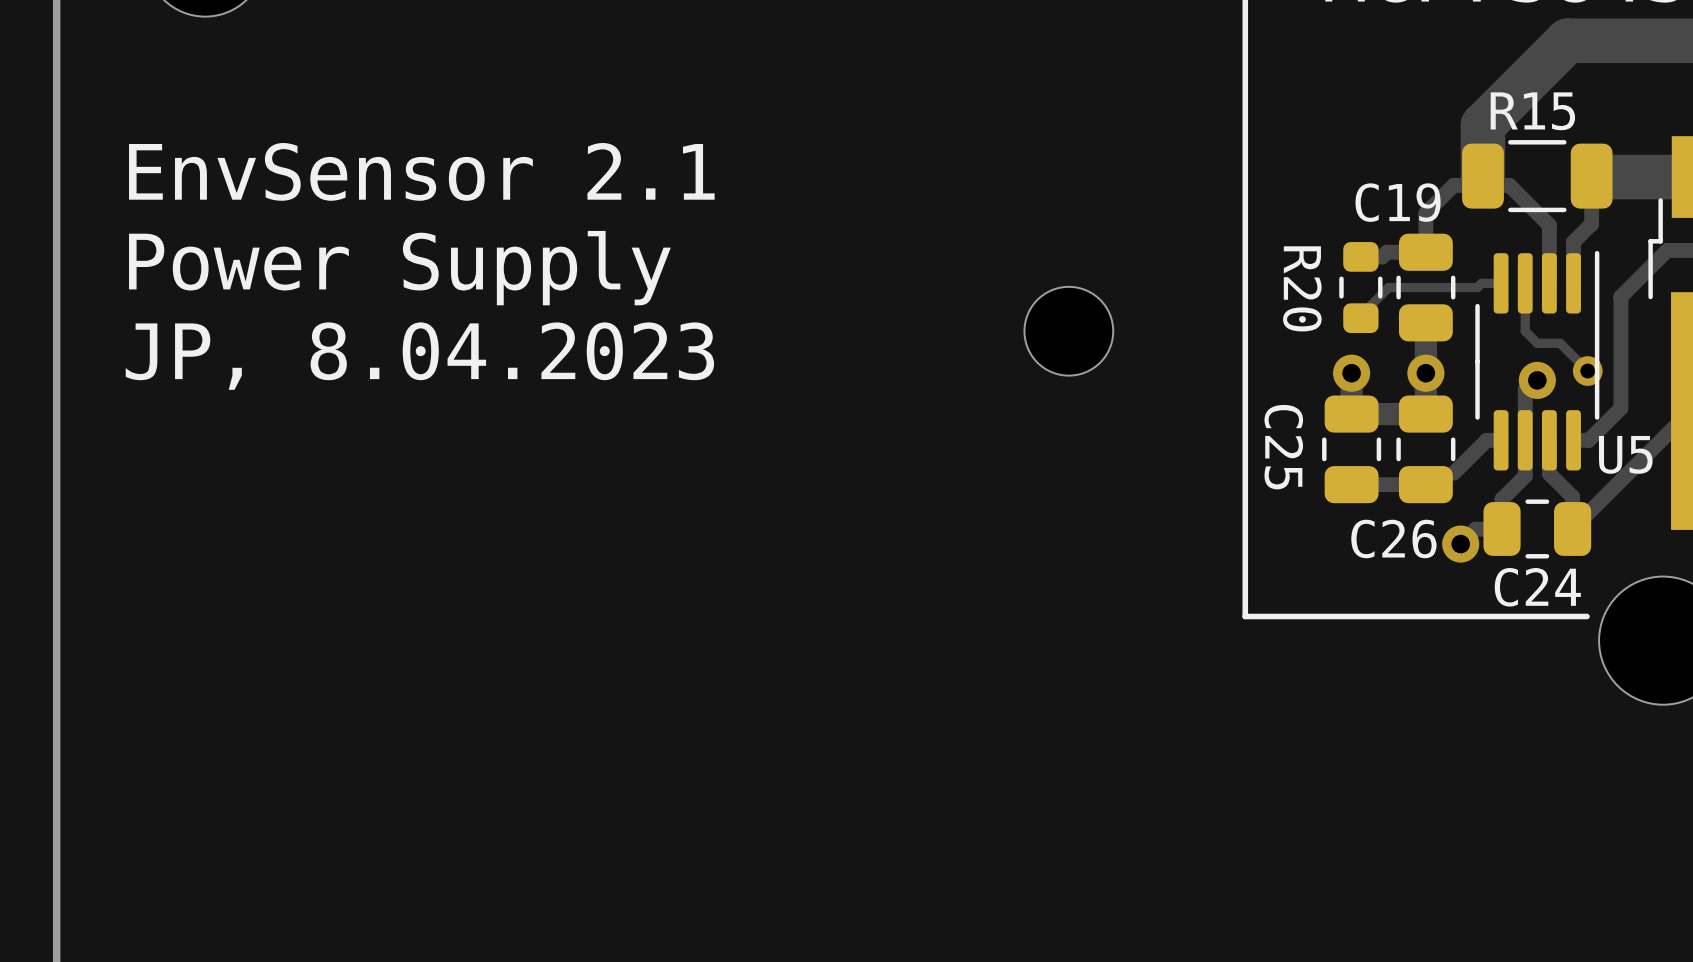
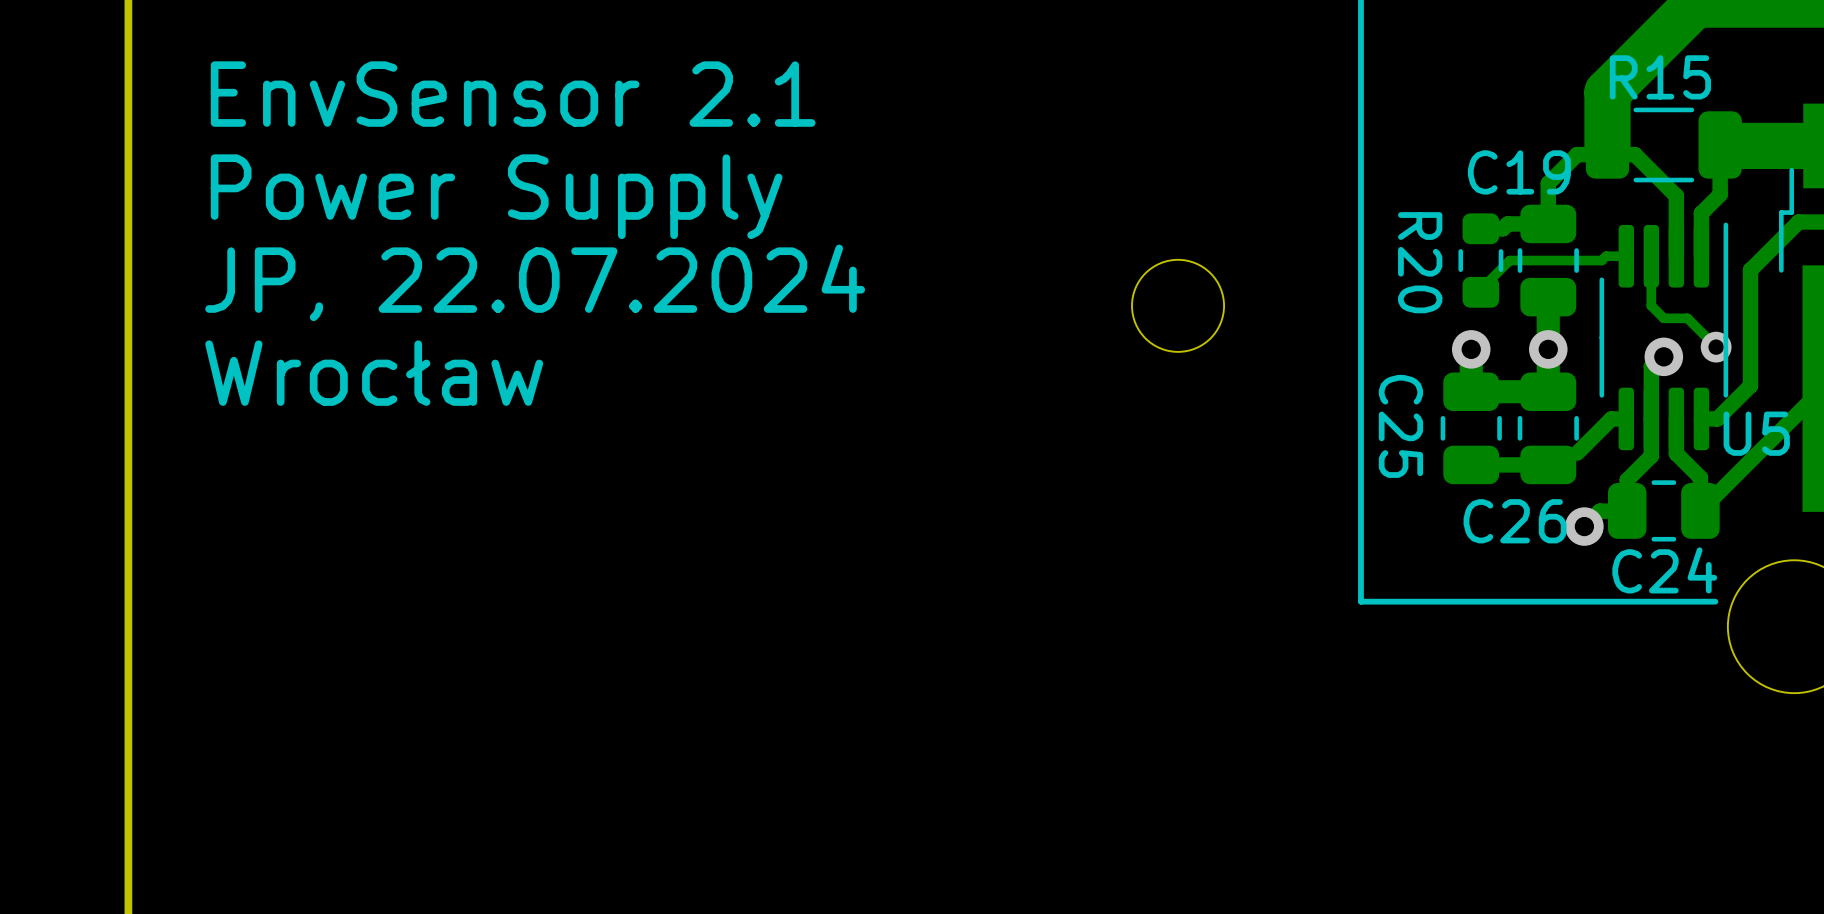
text position: EnvSensor 2.1 (421, 171) -> EnvSensor 2.1 (513, 94)
text position: Power Supply (399, 268) -> Power Supply (496, 196)
text: JP, 8.04.2023 (419, 356) -> JP, 22.07.2024 (535, 282)
text: none -> Wrocław (374, 373)

